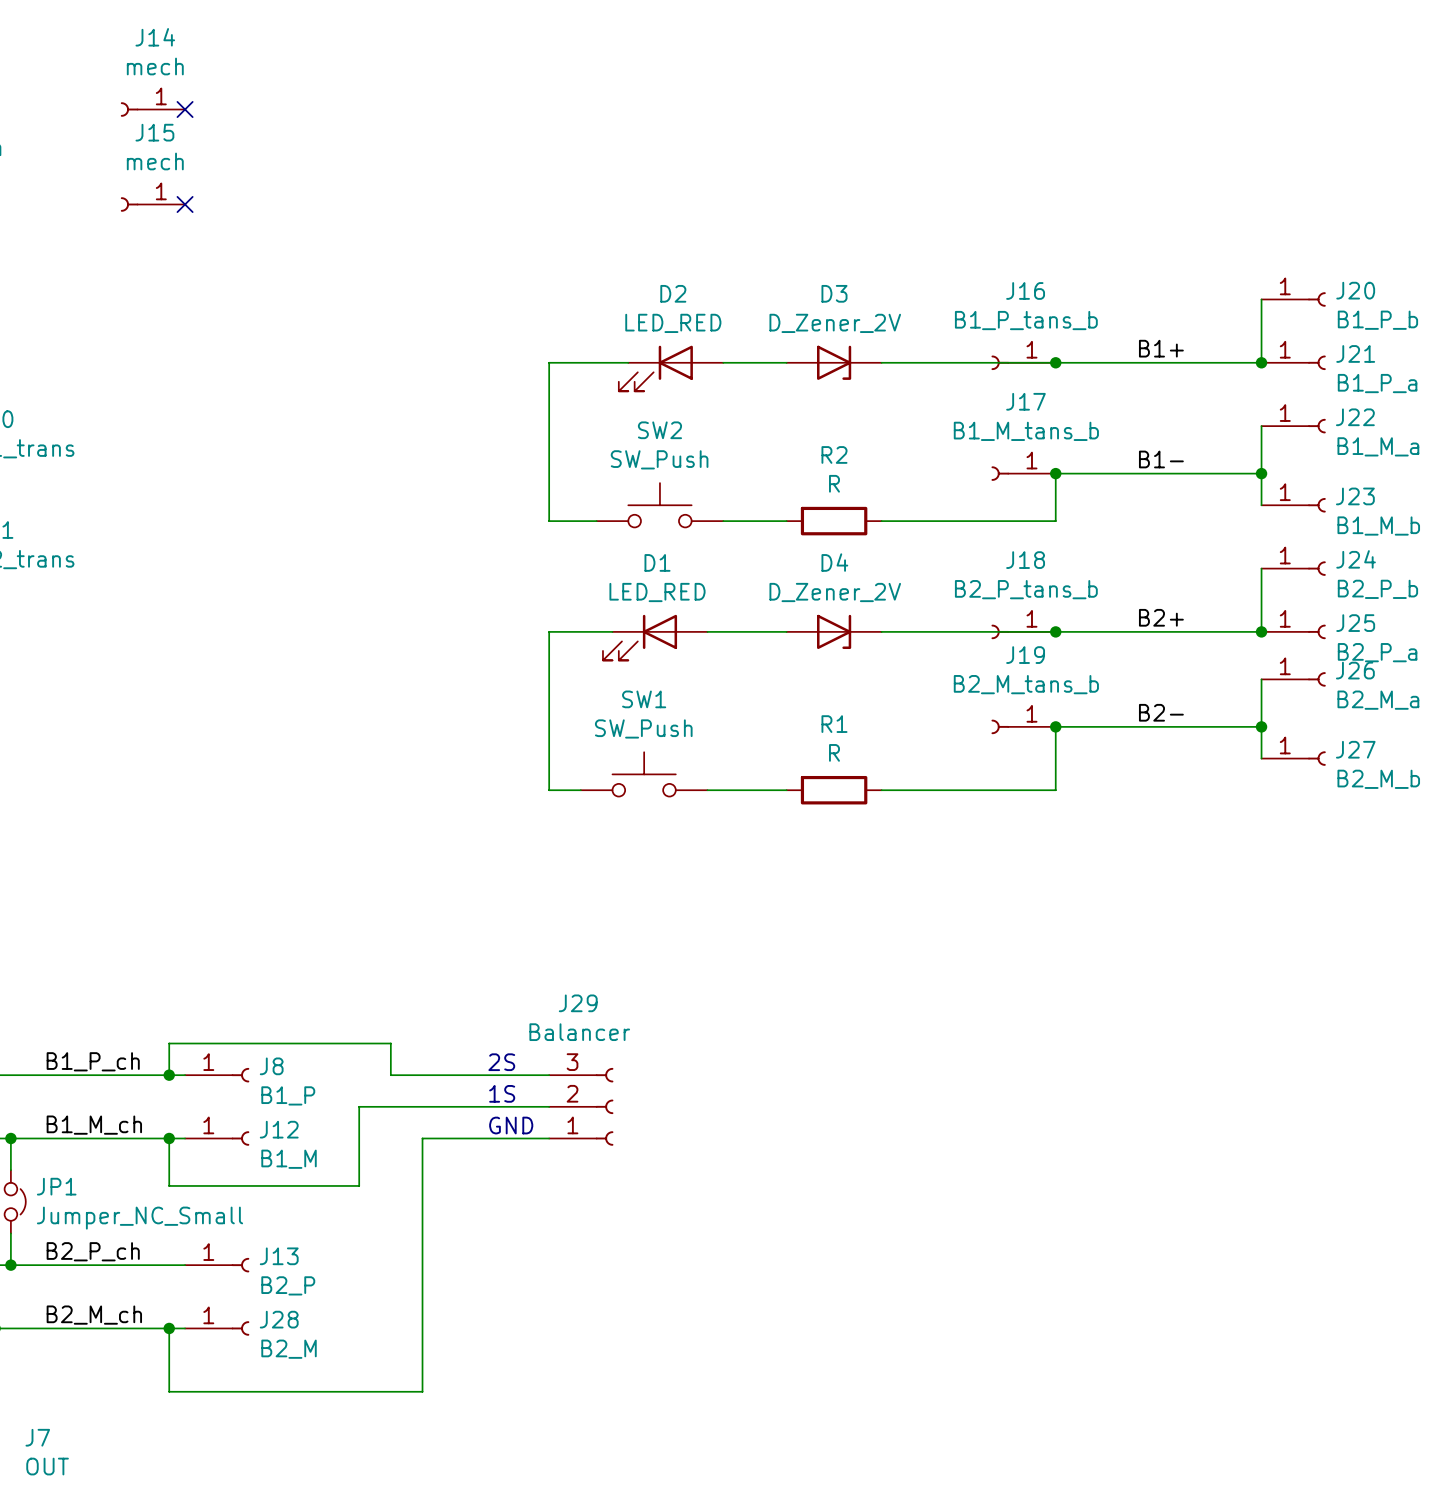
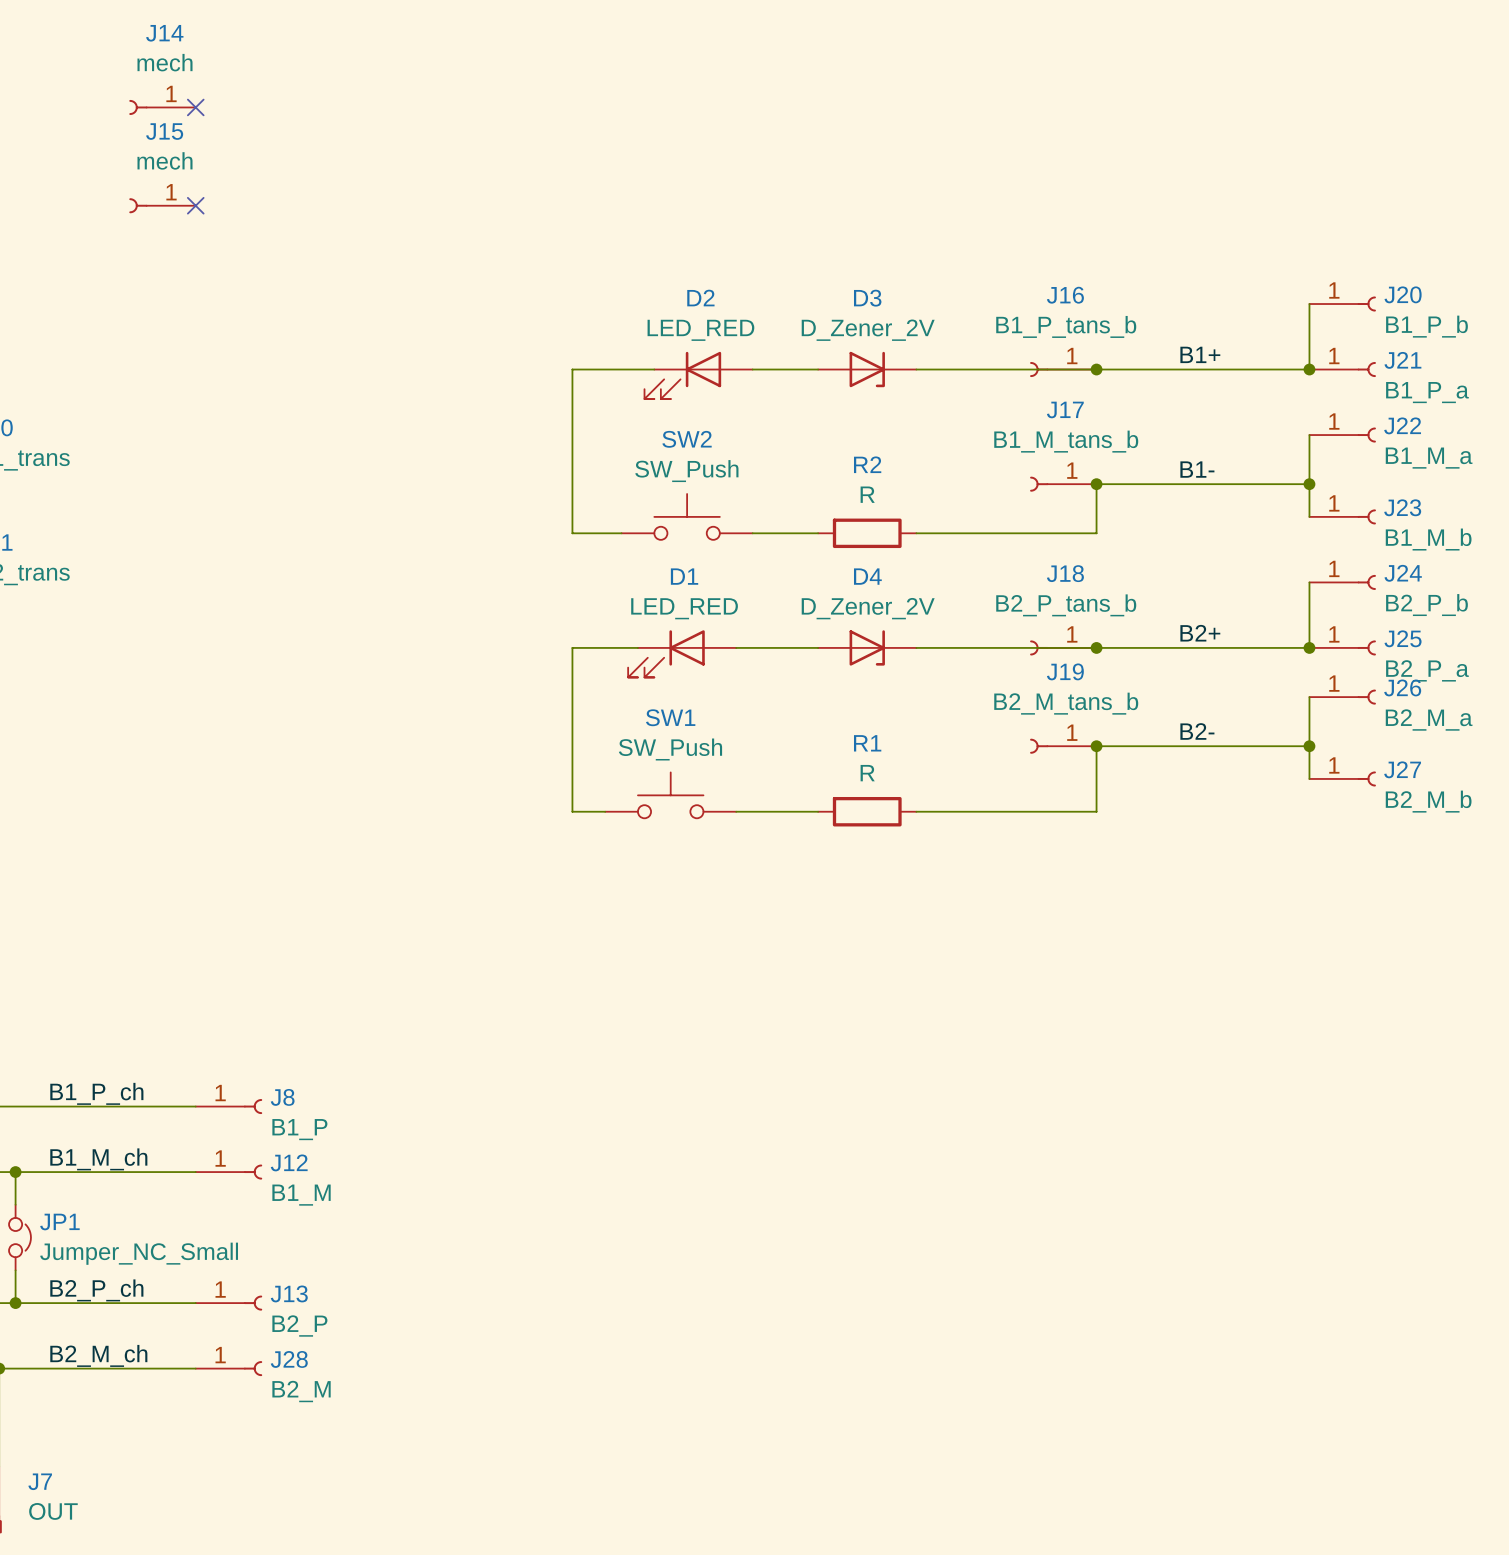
text: 2S (501, 1062) -> none
wire: (169, 1075) (169, 1043) (390, 1043) (390, 1075) (549, 1075) -> none
junction: (169, 1075) -> none
text: 1S (502, 1093) -> none
wire: (549, 1106) (359, 1106) (359, 1185) (169, 1185) (169, 1138) -> none
J29: Balancer (581, 1106) -> none
text: GND (511, 1125) -> none
junction: (169, 1138) -> none
wire: (549, 1138) (422, 1138) (422, 1391) (169, 1391) (169, 1328) -> none
junction: (169, 1328) -> none

